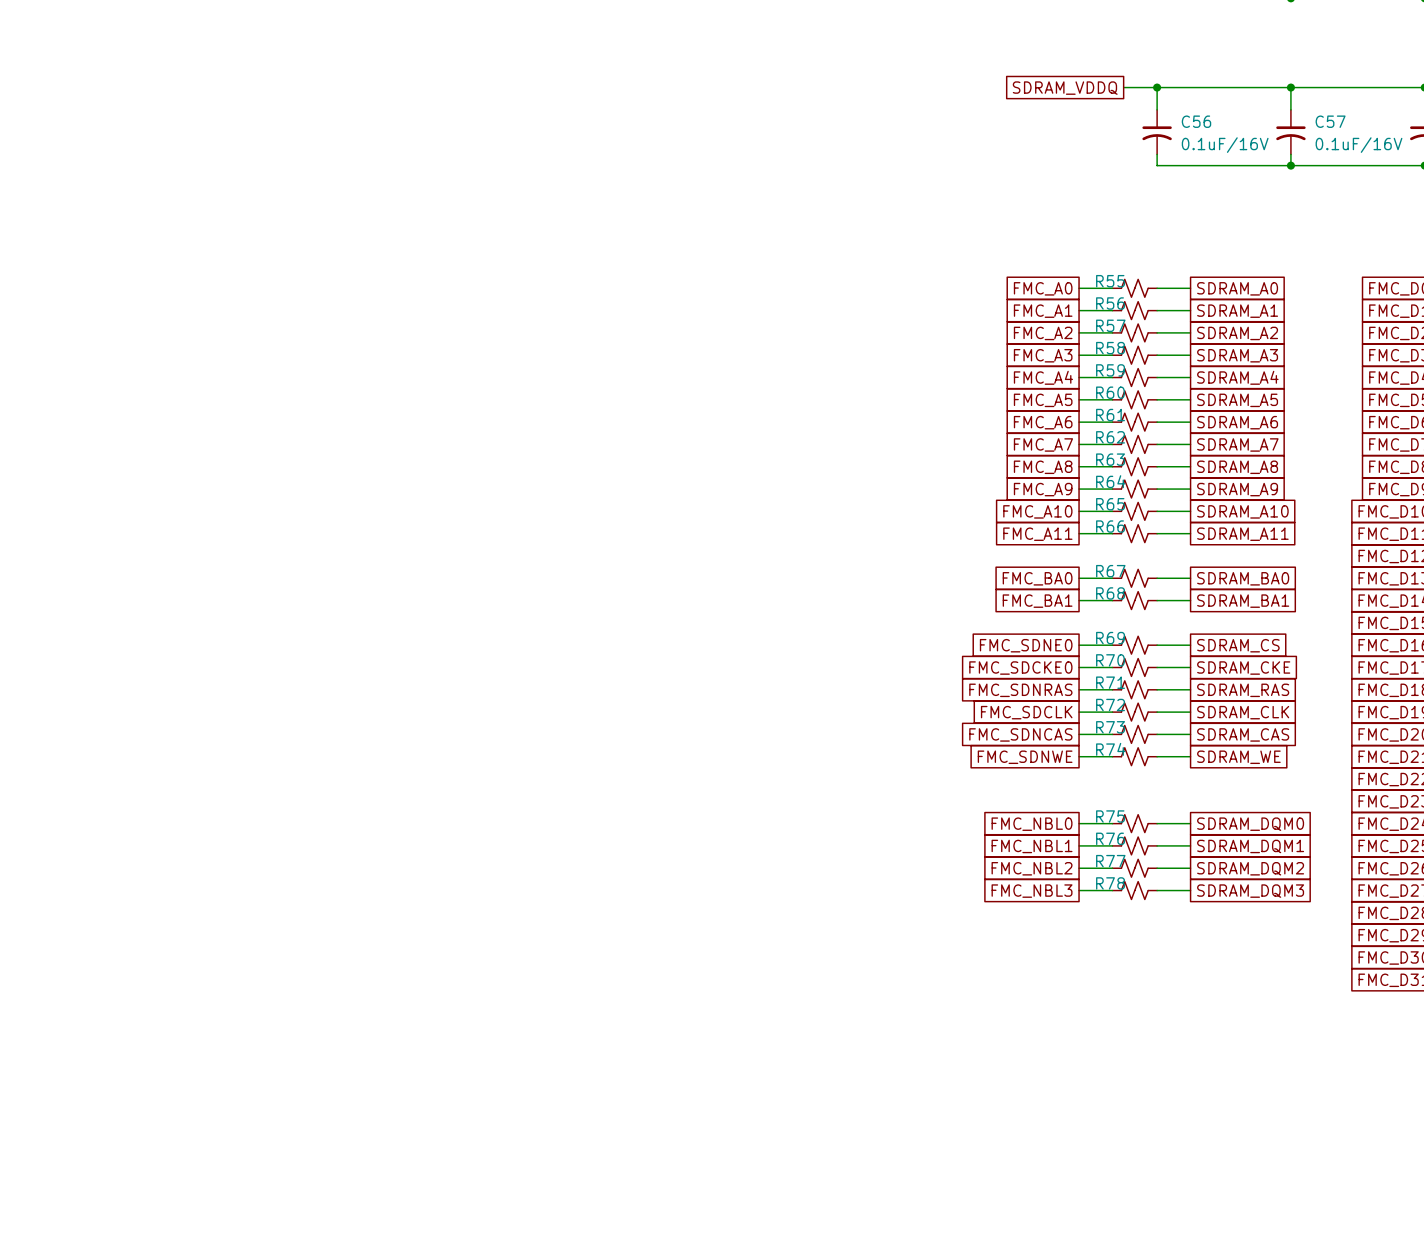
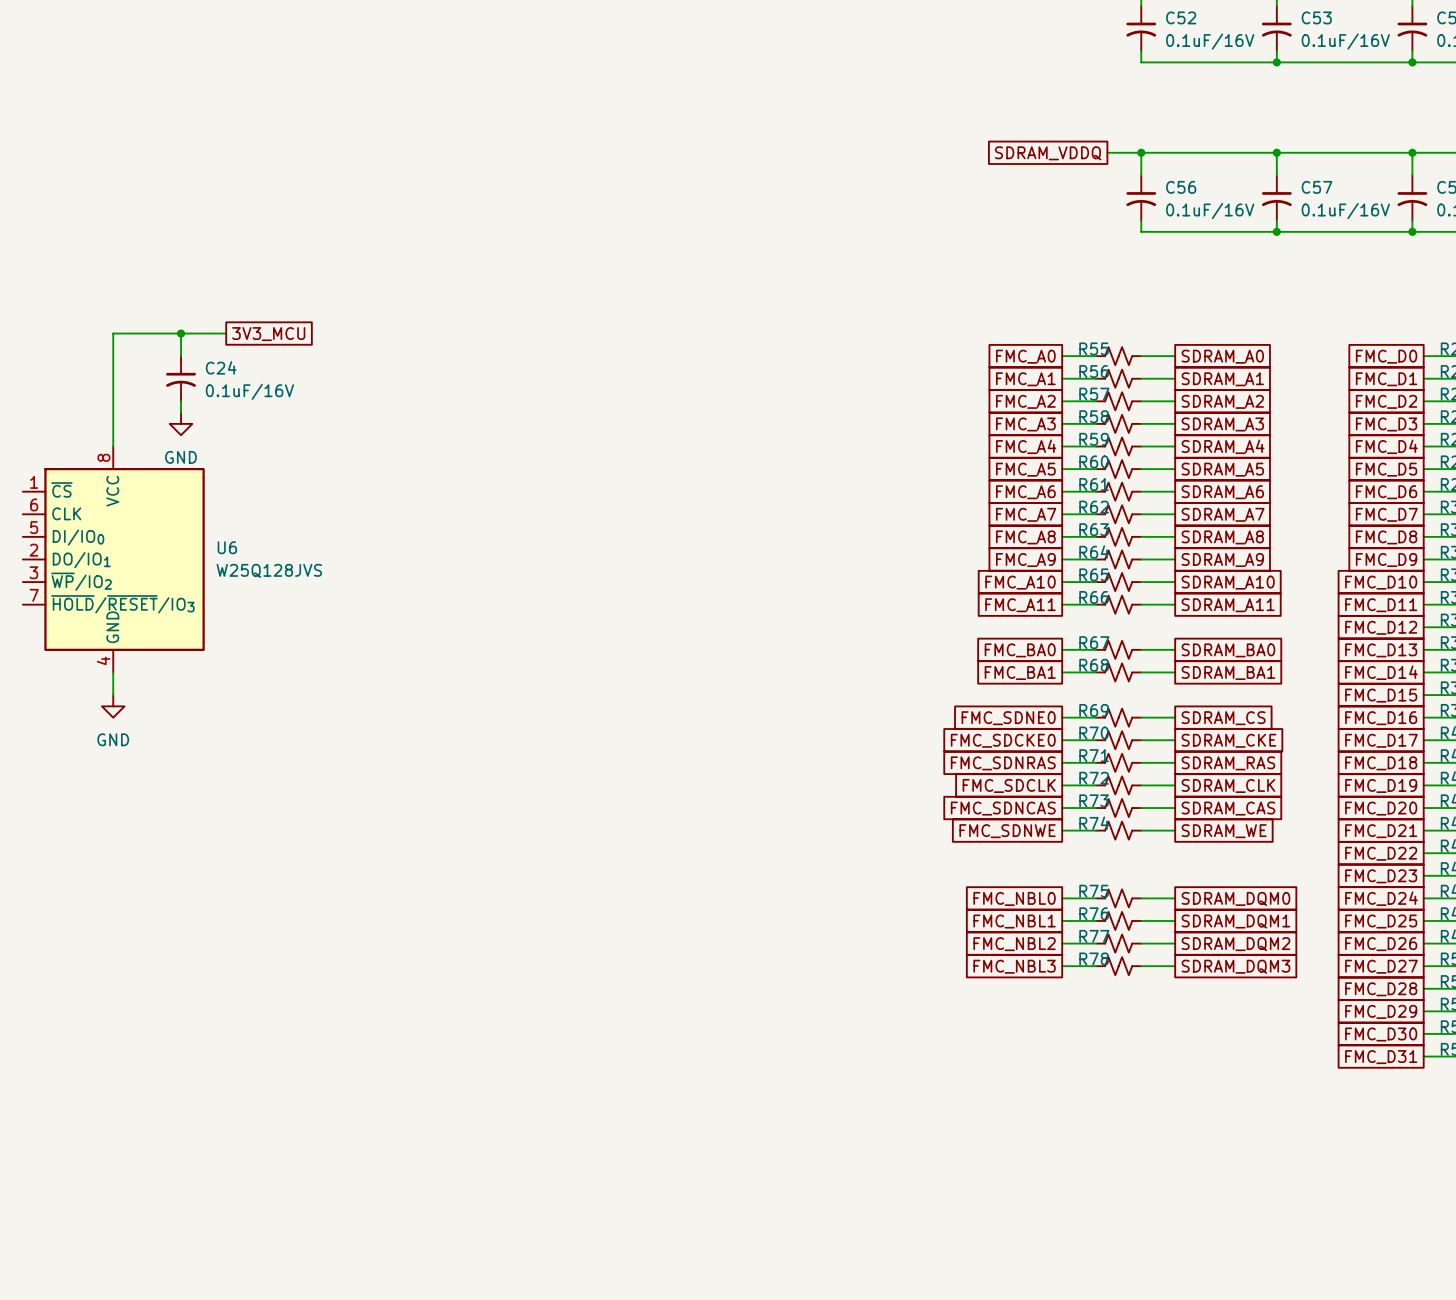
wire: none -> (181, 333) (181, 356)
junction: none -> (181, 333)
wire: none -> (226, 333) (113, 333) (113, 446)
global label: none -> 3V3_MCU (268, 334)
C24: none -> 0.1uF/16V (181, 378)
wire: none -> (181, 401) (181, 412)
power symbol: none -> GND (181, 423)
U6: none -> W25Q128JVS (113, 559)
wire: none -> (113, 672) (113, 695)
power symbol: none -> GND (113, 706)

